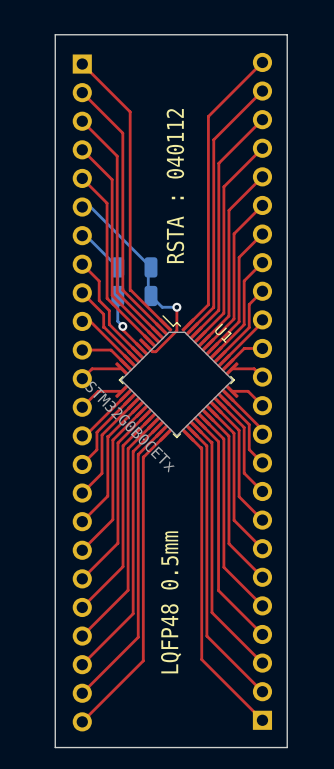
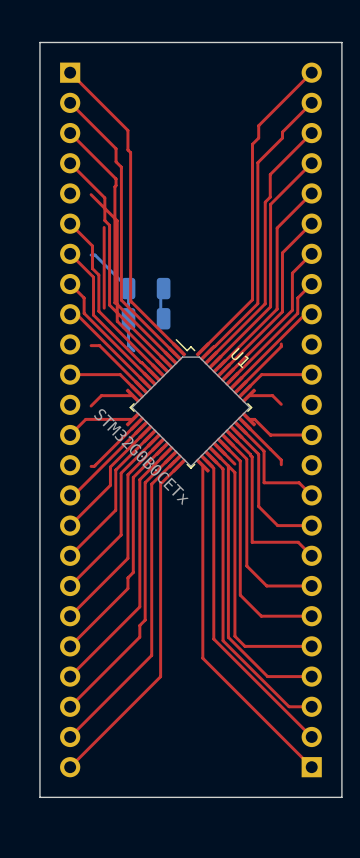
board edge: (55, 34) (287, 34) (287, 747) (55, 747) (55, 34) -> (39, 42) (39, 797) (341, 797) (341, 42) (39, 42)
top track: (262, 62) (208, 116) (208, 304) -> (311, 72) (258, 125) (258, 138) (252, 144) (252, 299) (224, 328)
top track: (82, 64) (130, 111) (130, 290) -> (70, 72) (127, 130) (127, 149) (130, 152) (130, 301) (142, 312)
top track: (262, 91) (213, 139) (213, 307) (198, 322) -> (311, 102) (282, 132) (282, 138) (257, 162) (257, 303) (213, 346)
top track: (82, 92) (122, 133) (122, 290) -> (70, 102) (116, 148) (116, 161) (121, 167) (121, 300) (133, 312)
top track: (262, 119) (218, 163) (218, 310) -> (311, 133) (270, 174) (270, 197) (265, 202) (265, 303) (235, 333)
top track: (82, 121) (117, 156) (117, 292) -> (70, 133) (116, 178) (114, 302) (127, 315)
top track: (262, 148) (223, 186) (223, 313) -> (311, 163) (270, 204) (270, 306) (240, 336)
top track: (82, 149) (112, 179) (112, 295) -> (70, 163) (104, 197) (104, 220) (109, 225) (109, 305) (122, 318)
top track: (262, 176) (228, 210) (228, 316) (204, 340) -> (311, 193) (277, 228) (277, 309) (220, 366)
text: RSTA : 040112 (175, 186) -> none
top track: (262, 205) (234, 233) (234, 318) -> (311, 223) (282, 252) (282, 311) (251, 342)
bottom track: (82, 207) (90, 207) (150, 267) -> none
top track: none -> (104, 227) (104, 308)
top track: (262, 234) (239, 257) (239, 321) -> (311, 253) (292, 273) (292, 310) (256, 346)
top track: (262, 262) (244, 280) (244, 324) -> (311, 284) (297, 298) (297, 313) (261, 349)
top track: (82, 264) (99, 281) (99, 300) (109, 310) (109, 324) -> (70, 284) (84, 298) (84, 313) (119, 348)
top track: (262, 291) (249, 304) (249, 327) -> (311, 314) (305, 314) (267, 352)
top track: (82, 292) (103, 314) (104, 327) -> (70, 314) (76, 314) (114, 352)
bottom track: (150, 296) (162, 307) (176, 307) -> none
top track: (176, 307) (176, 330) (155, 351) (152, 351) (145, 344) -> (70, 223) (92, 245) (92, 268) (98, 274) (98, 311) (158, 370)
via: (176, 307) -> none
top track: (122, 326) (122, 330) (130, 337) -> (70, 253) (93, 277) (93, 315) (141, 362)
via: (122, 326) -> none
top track: (262, 348) (243, 348) -> (311, 374) (261, 374)
top track: (82, 350) (111, 350) -> (70, 374) (121, 375)
top track: (98, 391) (82, 407) -> (107, 419) (85, 419) (70, 435)
top track: (237, 391) (248, 391) (262, 405) -> (254, 419) (270, 435) (311, 435)
part position: (262, 391) -> (311, 419)
part position: (82, 392) -> (70, 419)
top track: (129, 399) (96, 432) (96, 449) (82, 464) -> (141, 427) (73, 495) (70, 495)
top track: (149, 419) (123, 445) (123, 566) (82, 607) -> (161, 448) (133, 477) (133, 572) (127, 577) (127, 588) (70, 646)
top track: (246, 421) (249, 424) (249, 449) (262, 462) -> (264, 451) (264, 482) (299, 482) (311, 495)
top track: (233, 424) (239, 430) (239, 496) (262, 520) -> (250, 454) (252, 456) (252, 542) (298, 542) (311, 555)
top track: (241, 424) (244, 427) (244, 473) (262, 491) -> (258, 454) (258, 506) (277, 525) (311, 525)
top track: (229, 429) (234, 433) (234, 520) (262, 548) -> (246, 459) (246, 566) (266, 586) (311, 586)
top track: (223, 430) (228, 436) (228, 543) (262, 577) -> (240, 461) (240, 595) (261, 616) (311, 616)
top track: (161, 431) (138, 454) (138, 637) (82, 693) -> (174, 461) (151, 484) (151, 655) (70, 736)
top track: (218, 433) (223, 439) (223, 567) (262, 605) -> none
top track: (102, 435) (102, 473) (82, 493) -> (111, 465) (110, 485) (70, 525)
top track: (188, 435) (201, 447) (201, 659) (262, 720) -> (202, 465) (202, 658) (311, 767)
top track: none -> (228, 465) (228, 637) (267, 676) (311, 676)
top track: (108, 436) (107, 496) (82, 521) -> (118, 466) (115, 470) (115, 510) (70, 555)
top track: (198, 437) (206, 445) (206, 636) (262, 691) -> (213, 468) (213, 639) (311, 736)
top track: (207, 438) (211, 442) (211, 612) (262, 663) -> (223, 469) (223, 640) (289, 706) (311, 706)
top track: (112, 440) (112, 519) (82, 550) -> (123, 470) (121, 473) (121, 535) (70, 586)
top track: (117, 442) (117, 543) (82, 578) -> (128, 473) (127, 558) (70, 616)
top track: (128, 448) (128, 590) (82, 636) -> (139, 479) (139, 606) (70, 676)
top track: (133, 451) (133, 613) (82, 664) -> (145, 482) (145, 620) (139, 625) (139, 637) (70, 706)
top track: (149, 451) (143, 457) (143, 660) (82, 721) -> (161, 482) (160, 676) (70, 767)
top track: (218, 590) (262, 634) -> (234, 629) (234, 636) (244, 646) (311, 646)
text: LQFP48 0.5mm (171, 602) -> none

